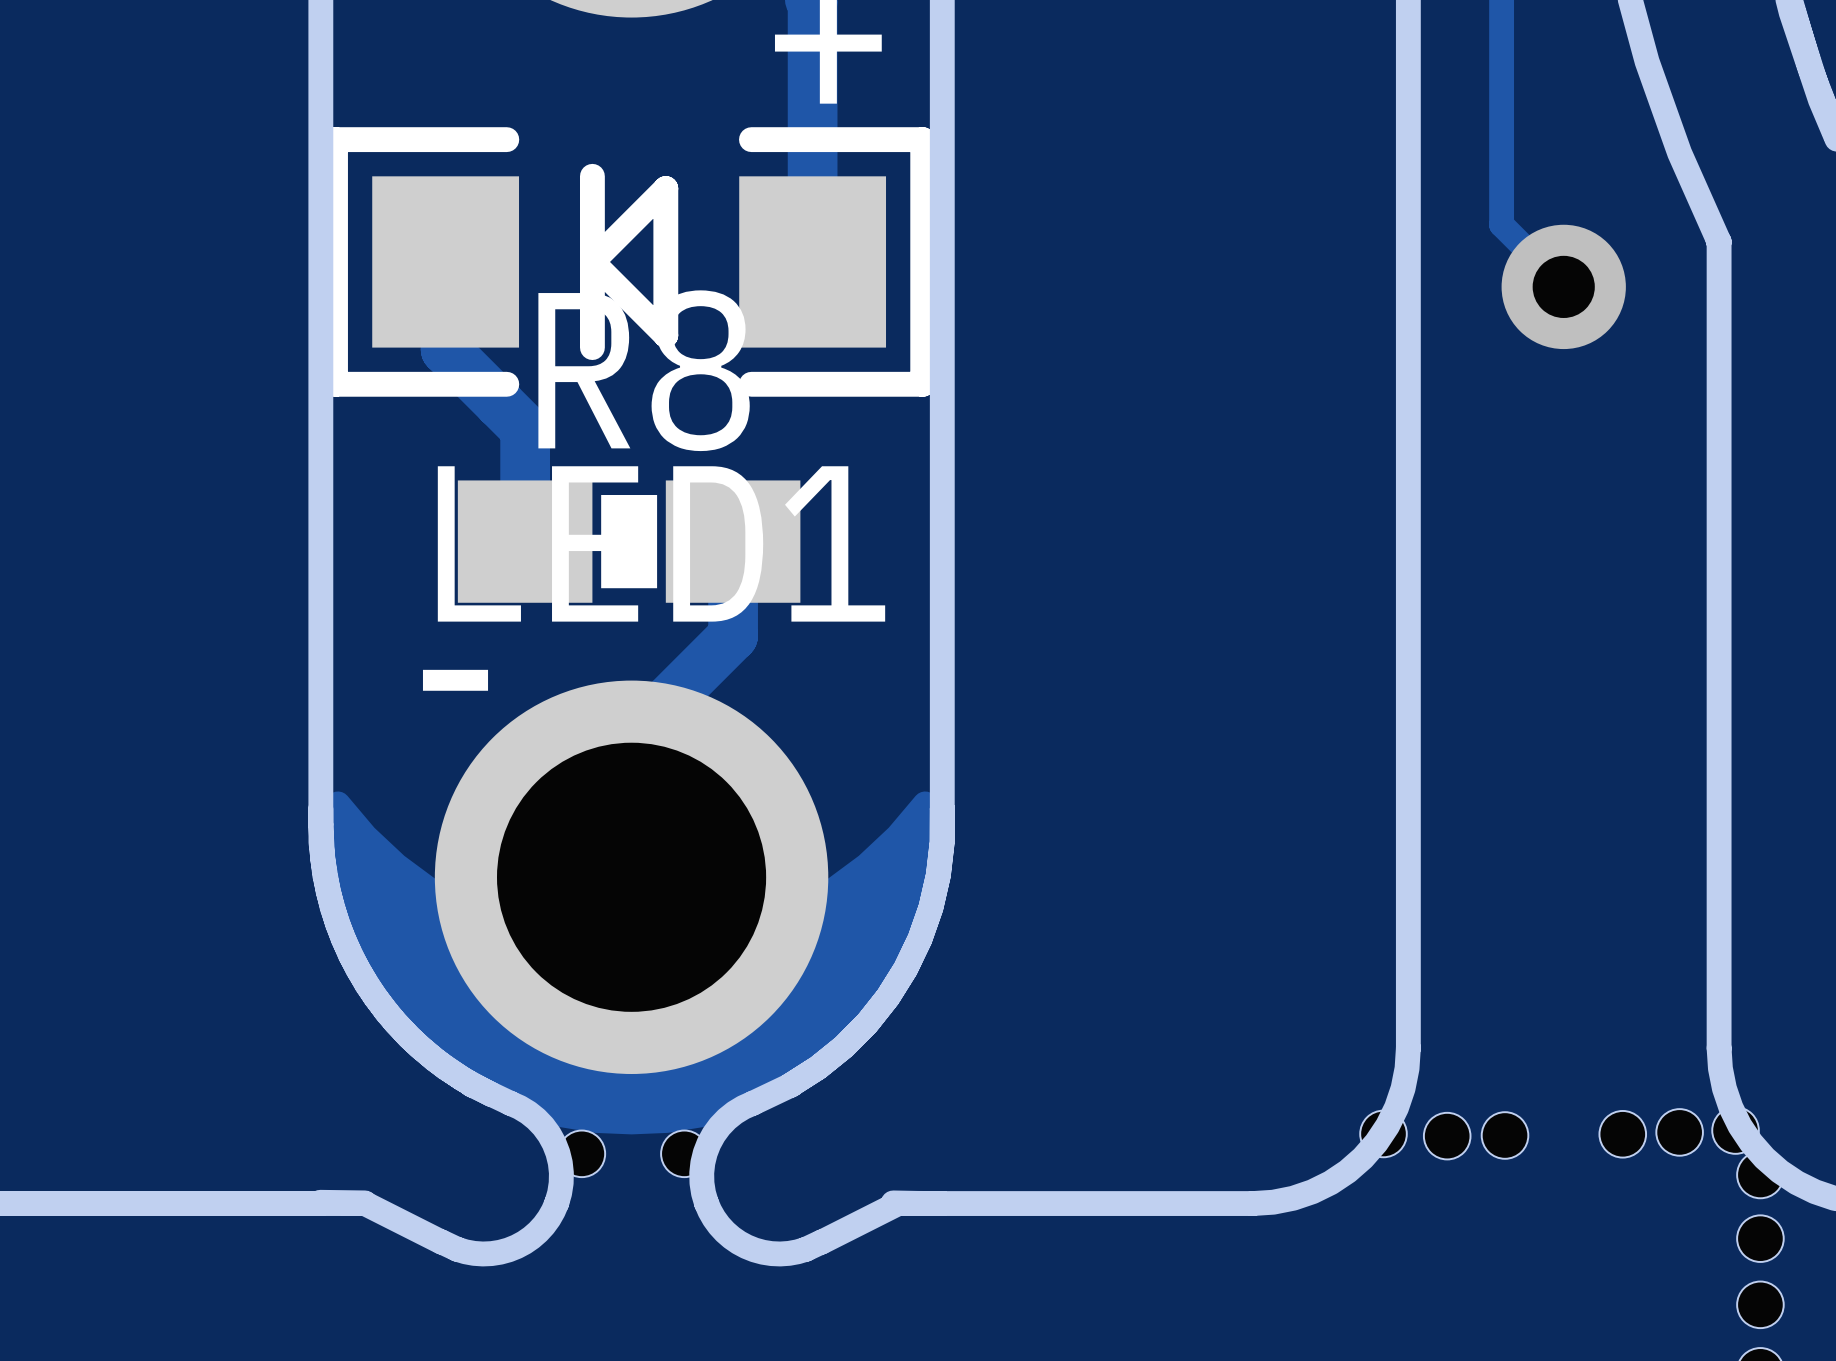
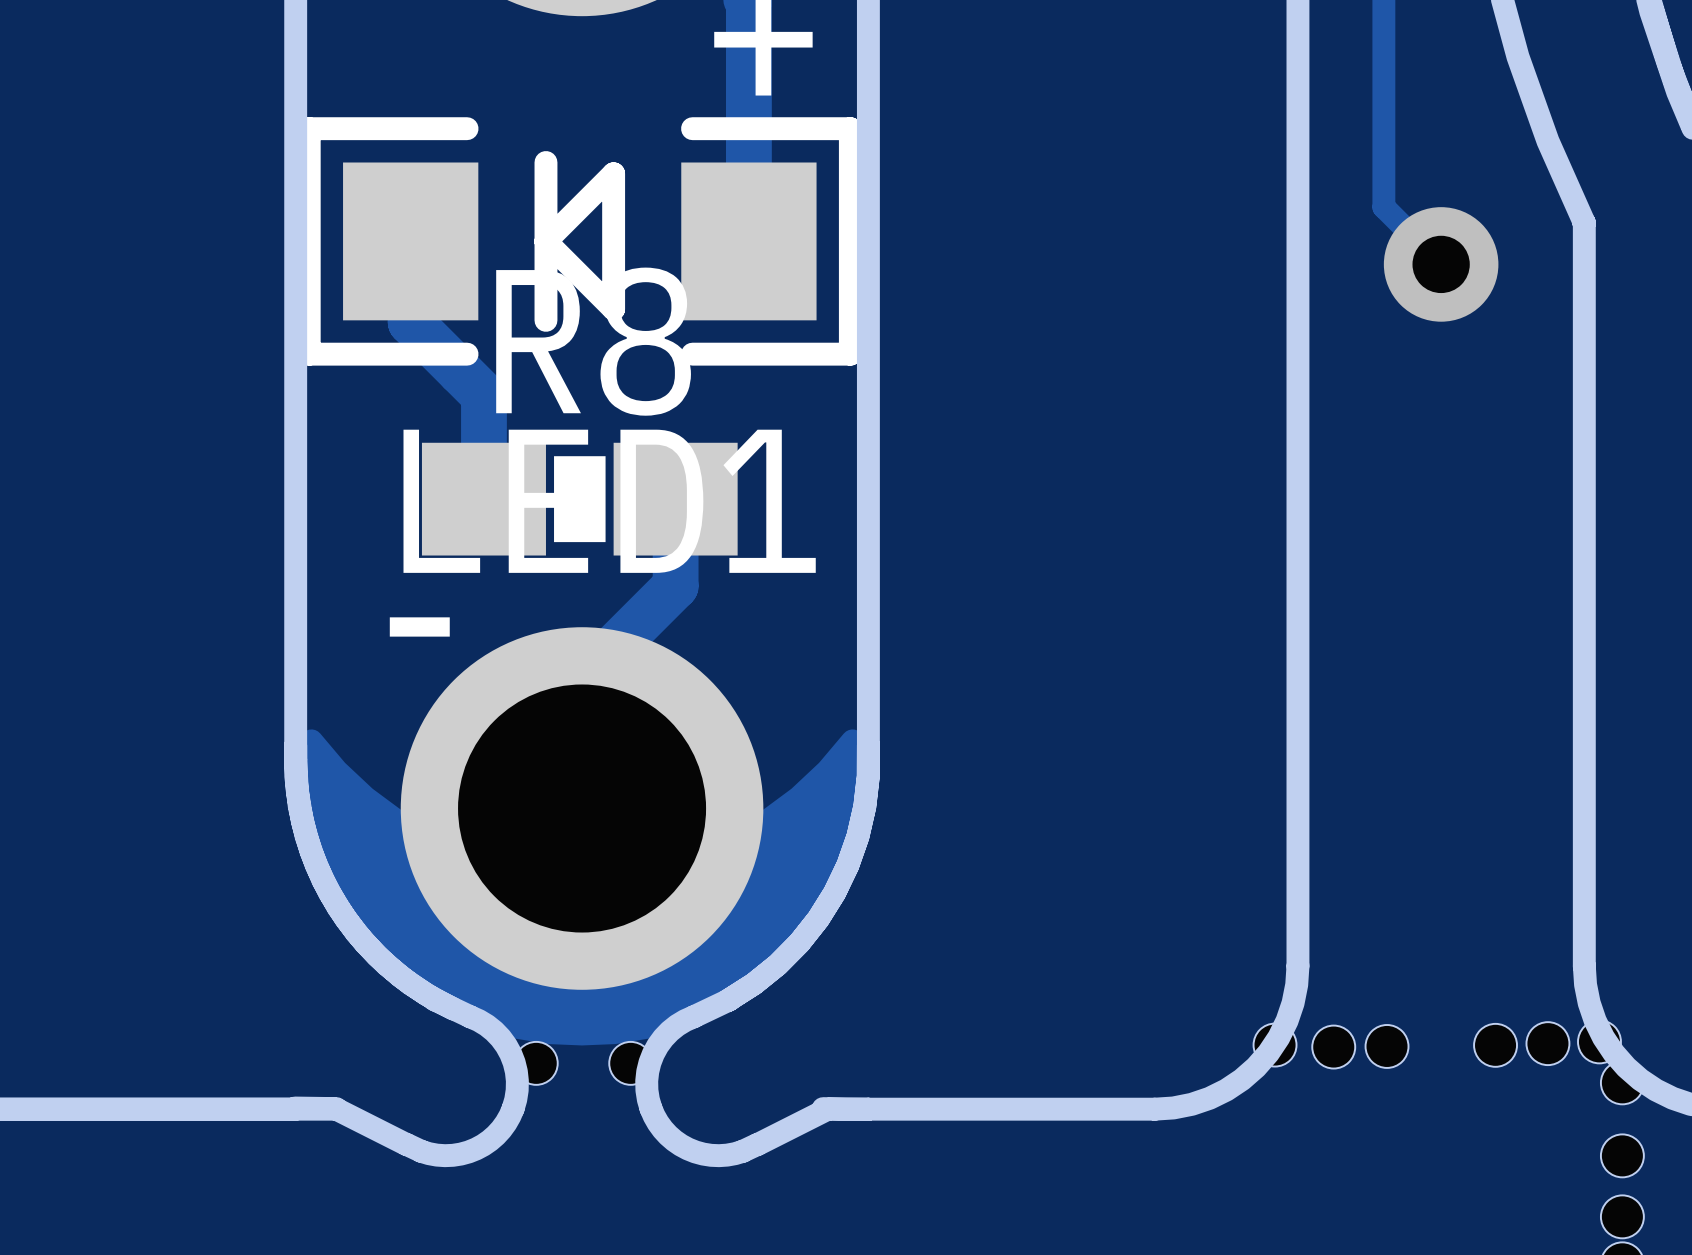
hole position: (1760, 1238) -> (1622, 1155)
hole position: (1760, 1304) -> (1622, 1216)

